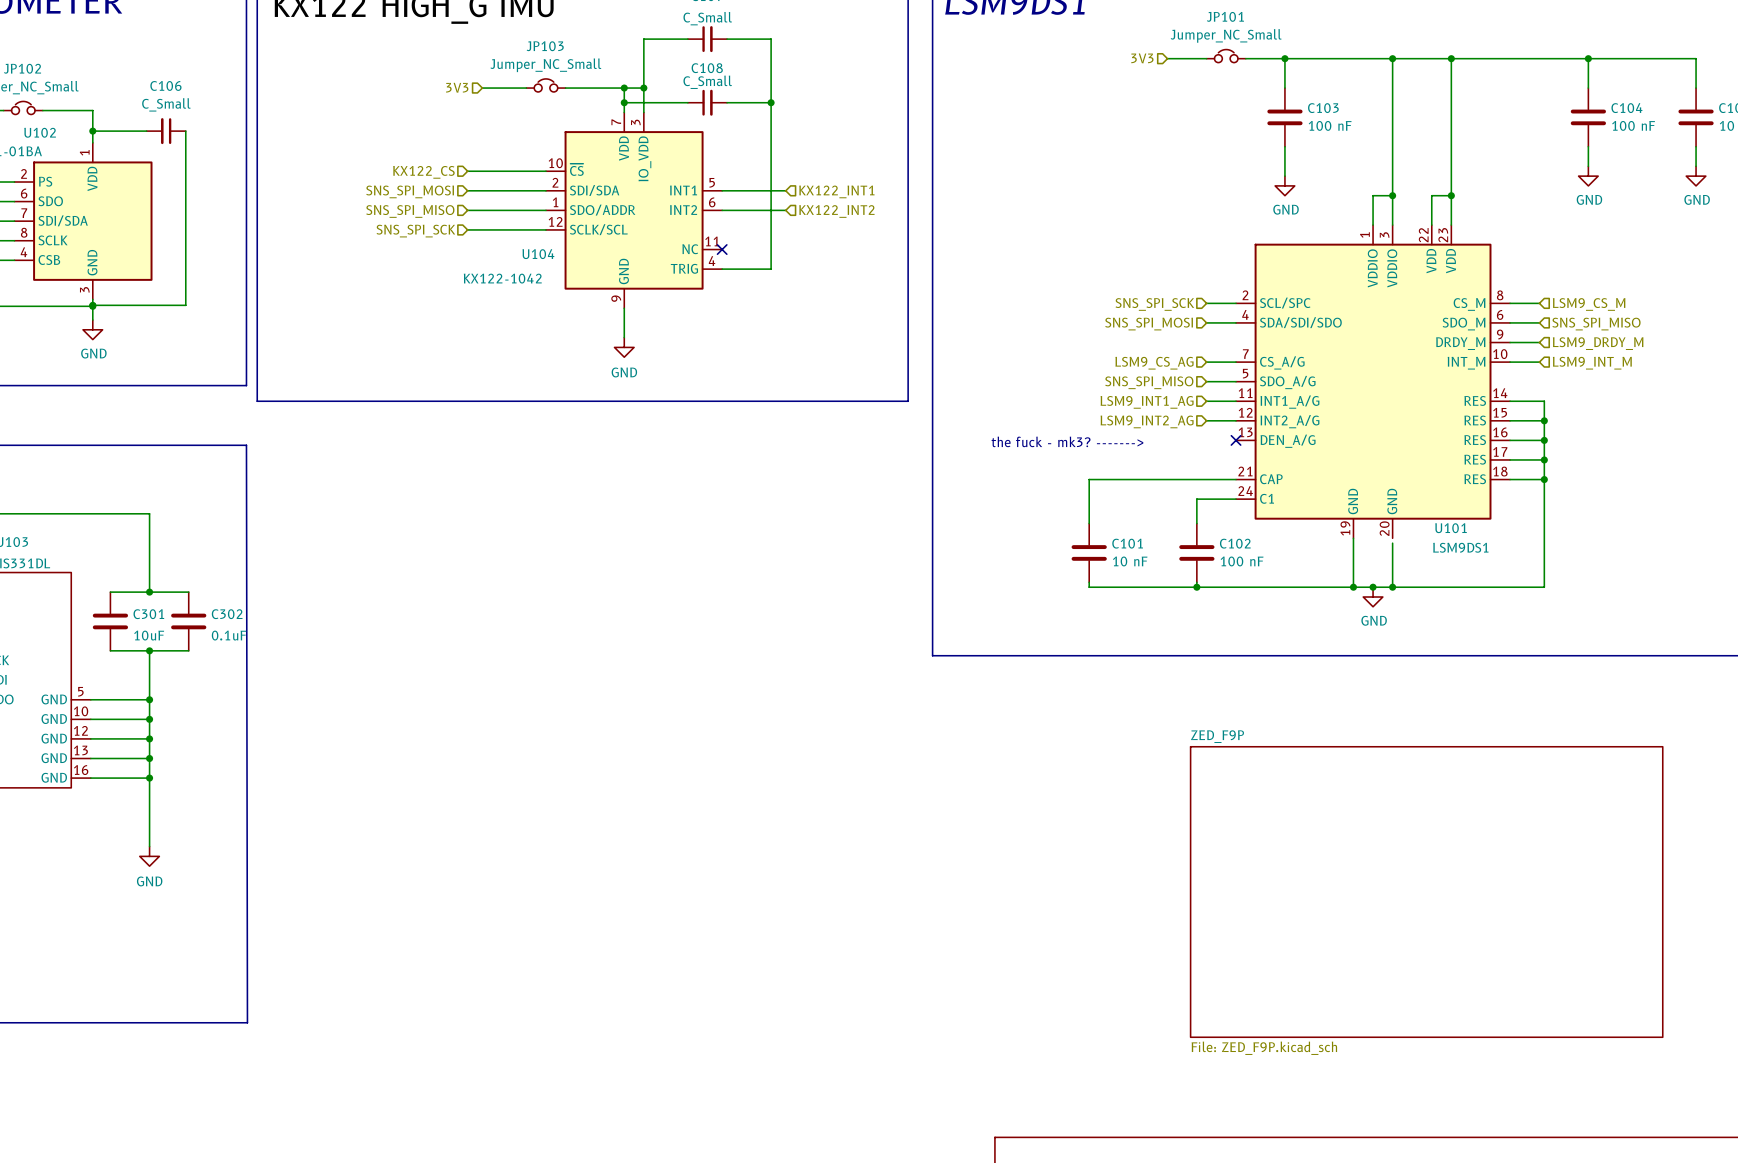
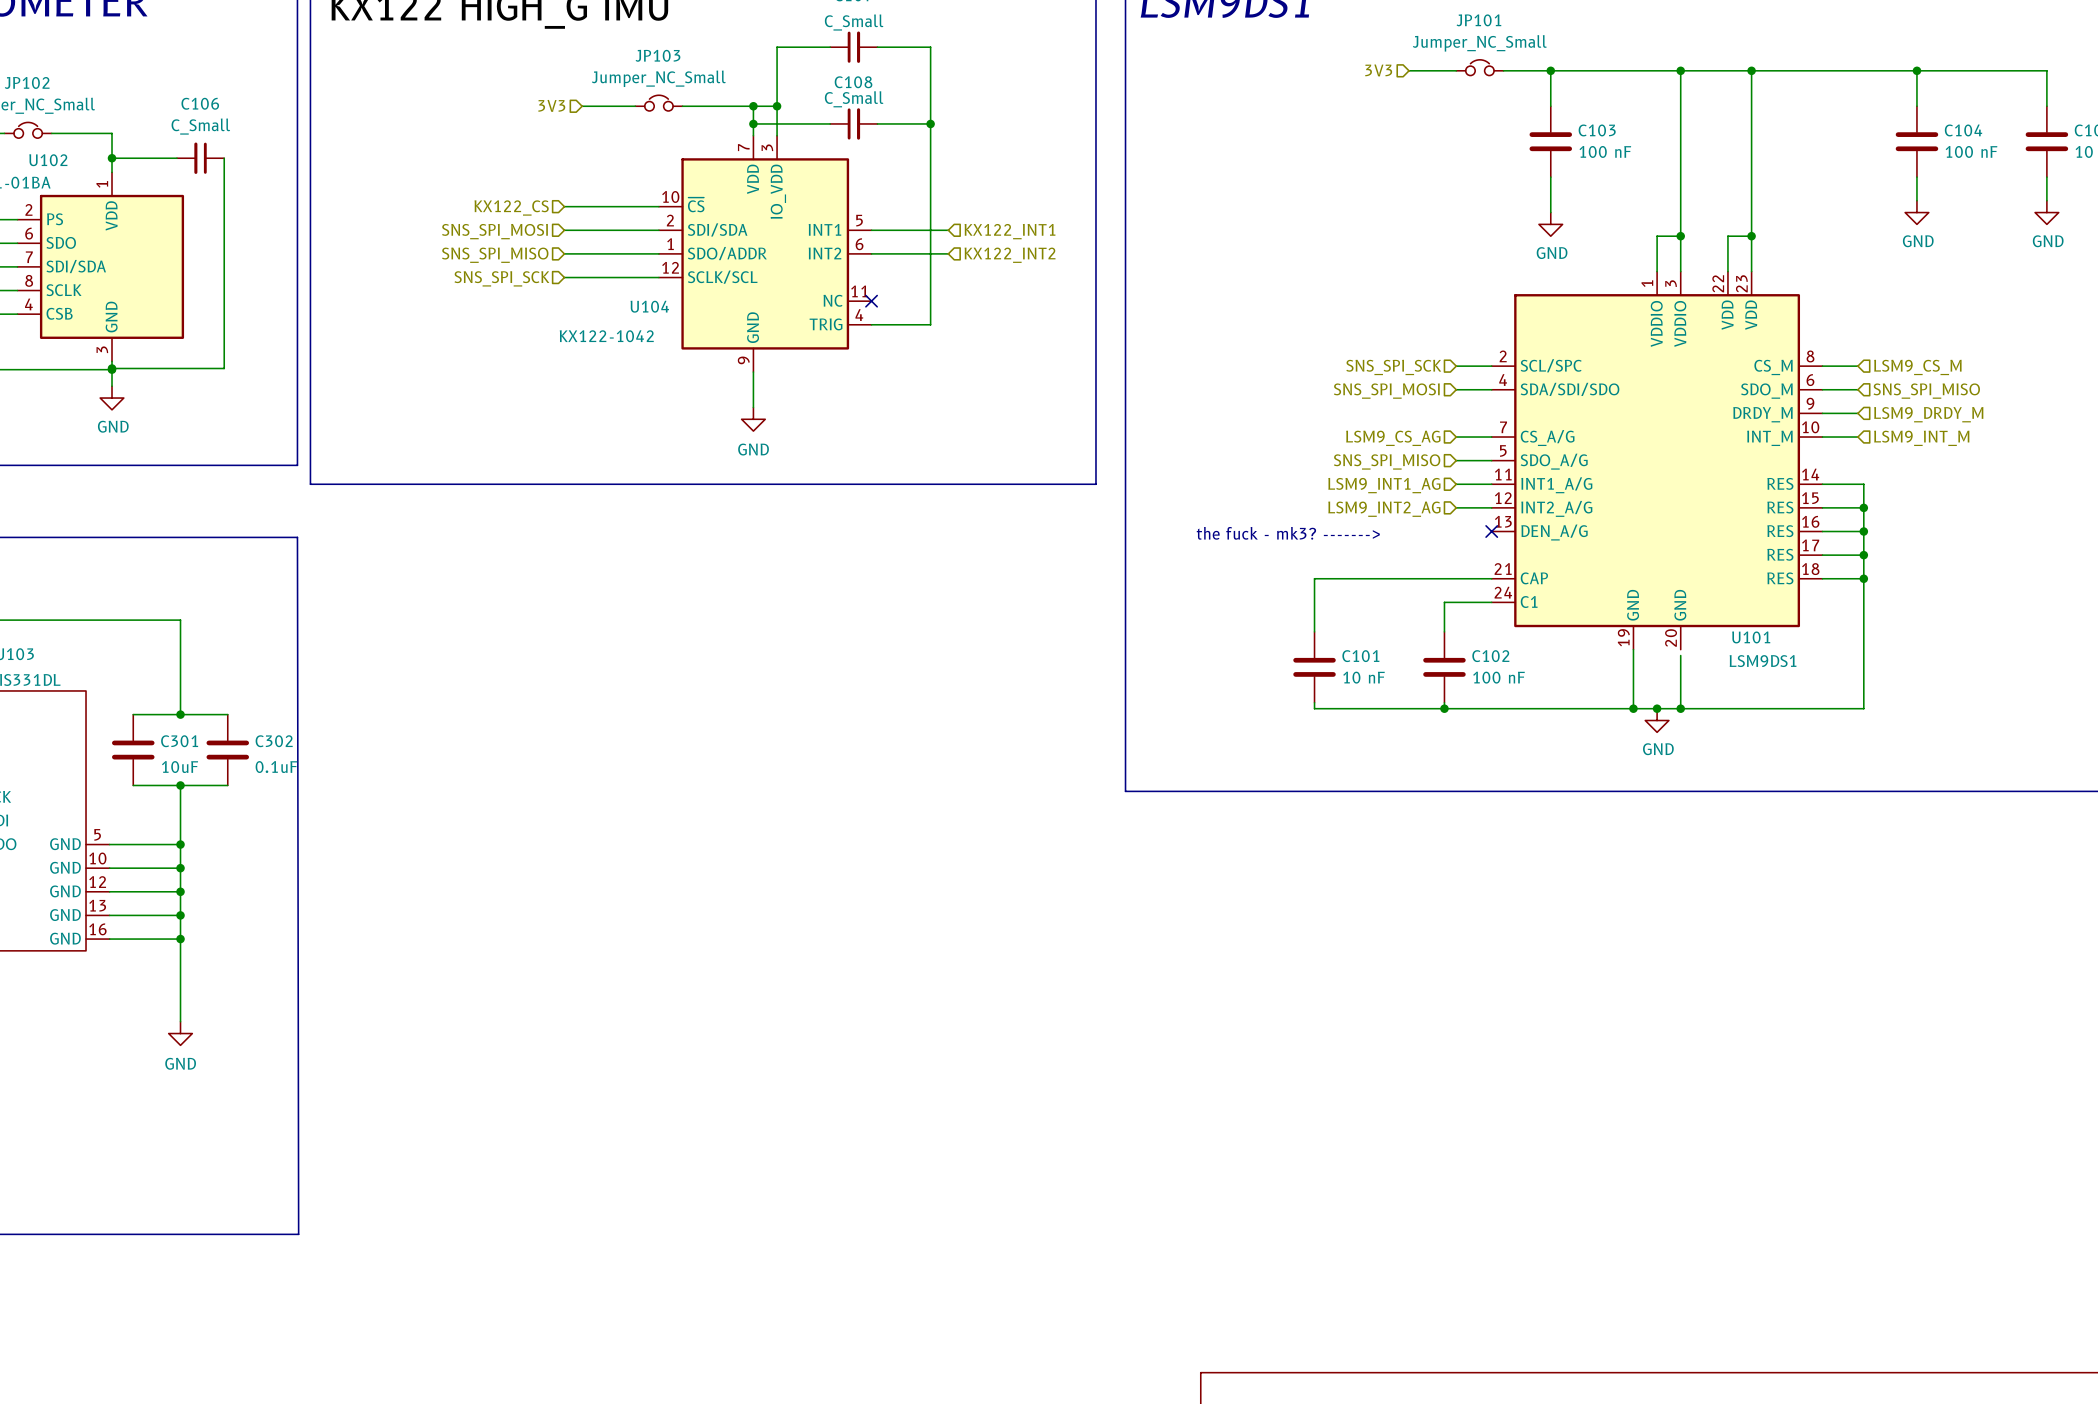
sheet ZED_F9P: File: ZED_F9P.kicad_sch (1426, 892) -> none

